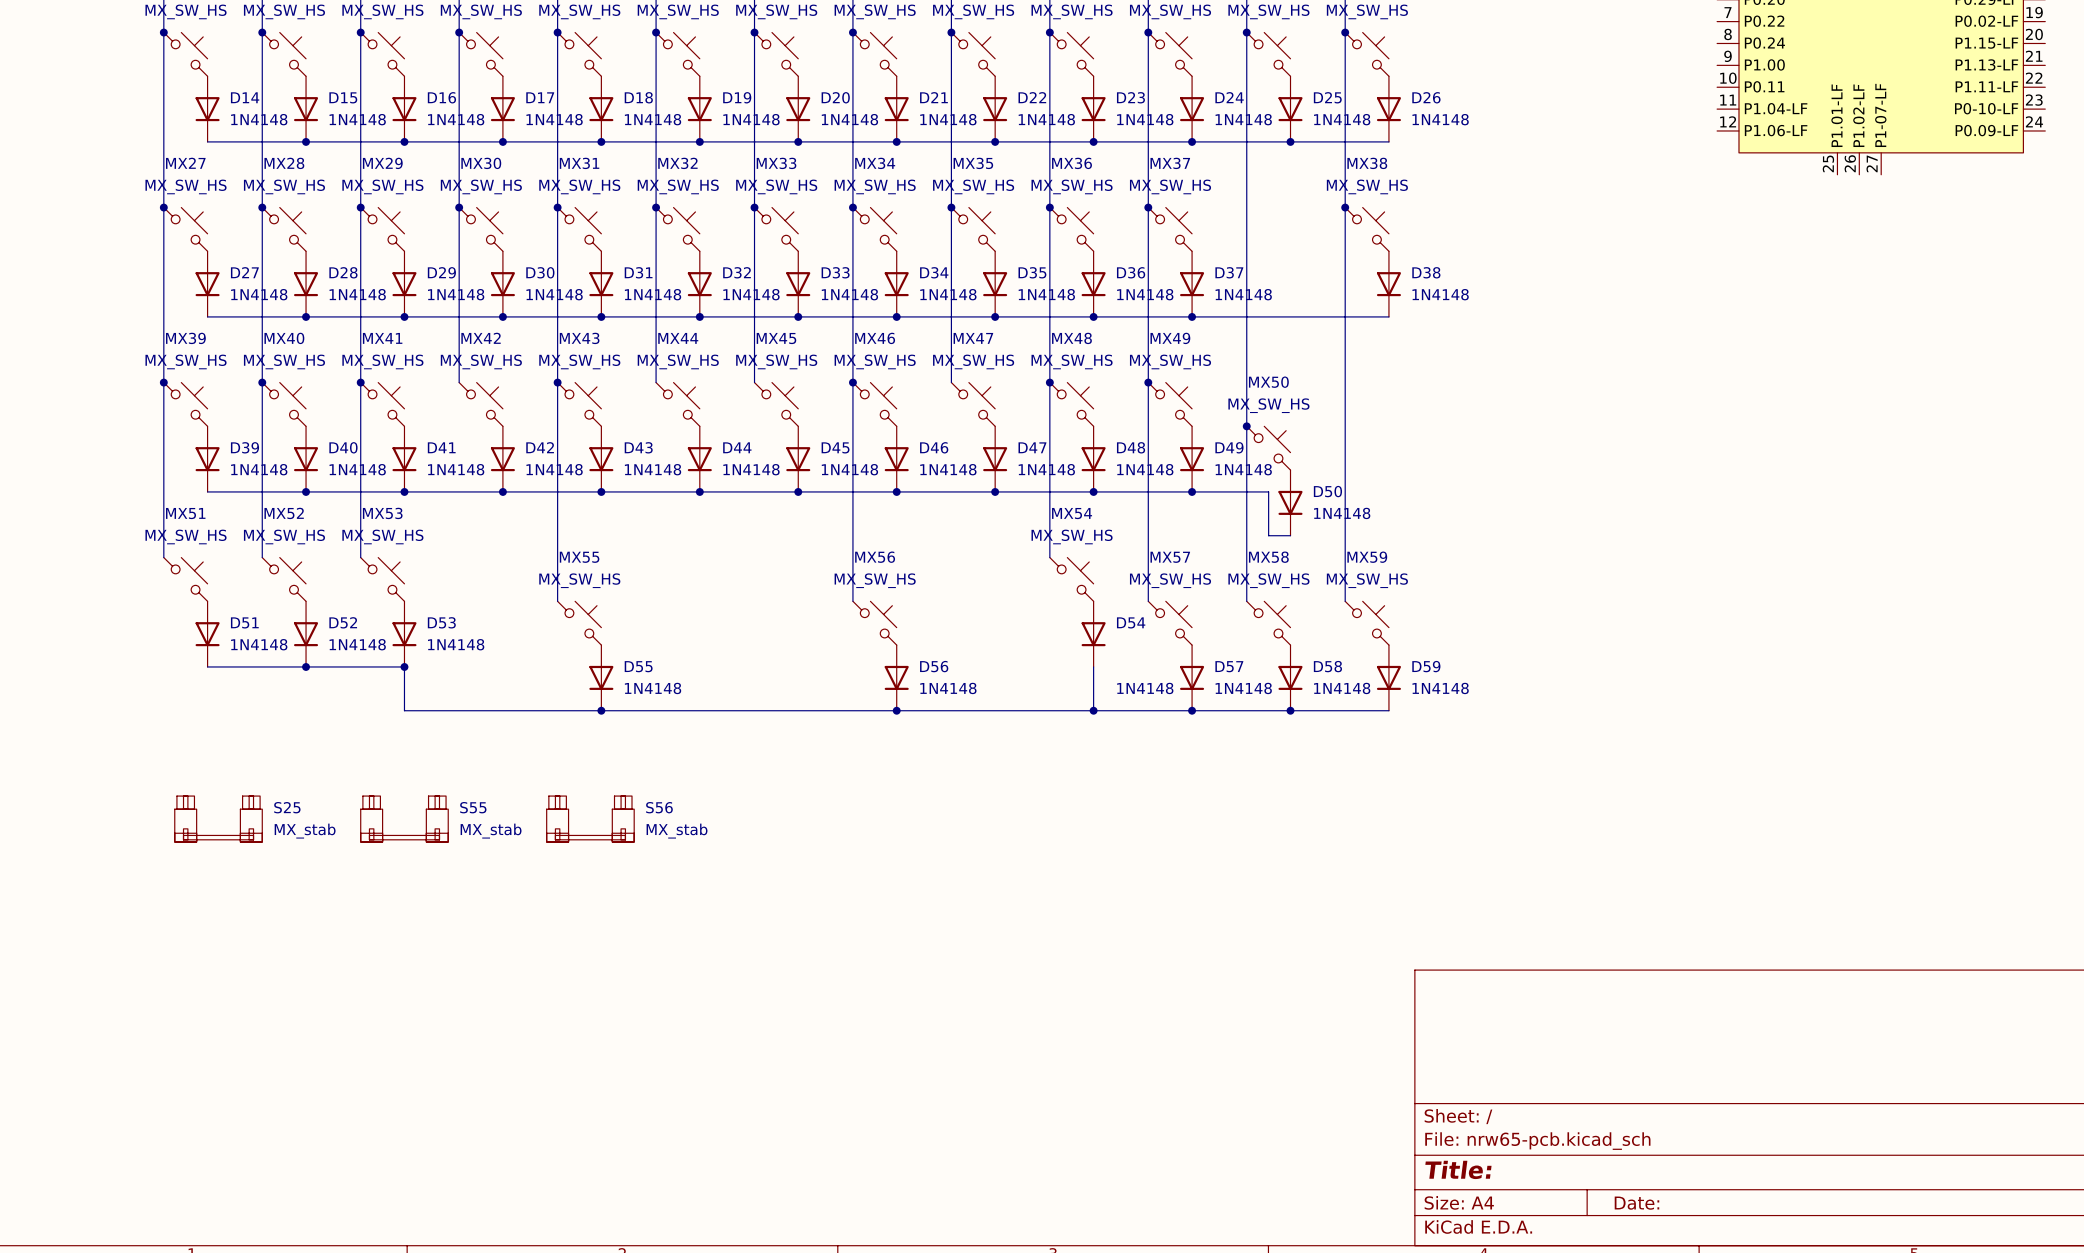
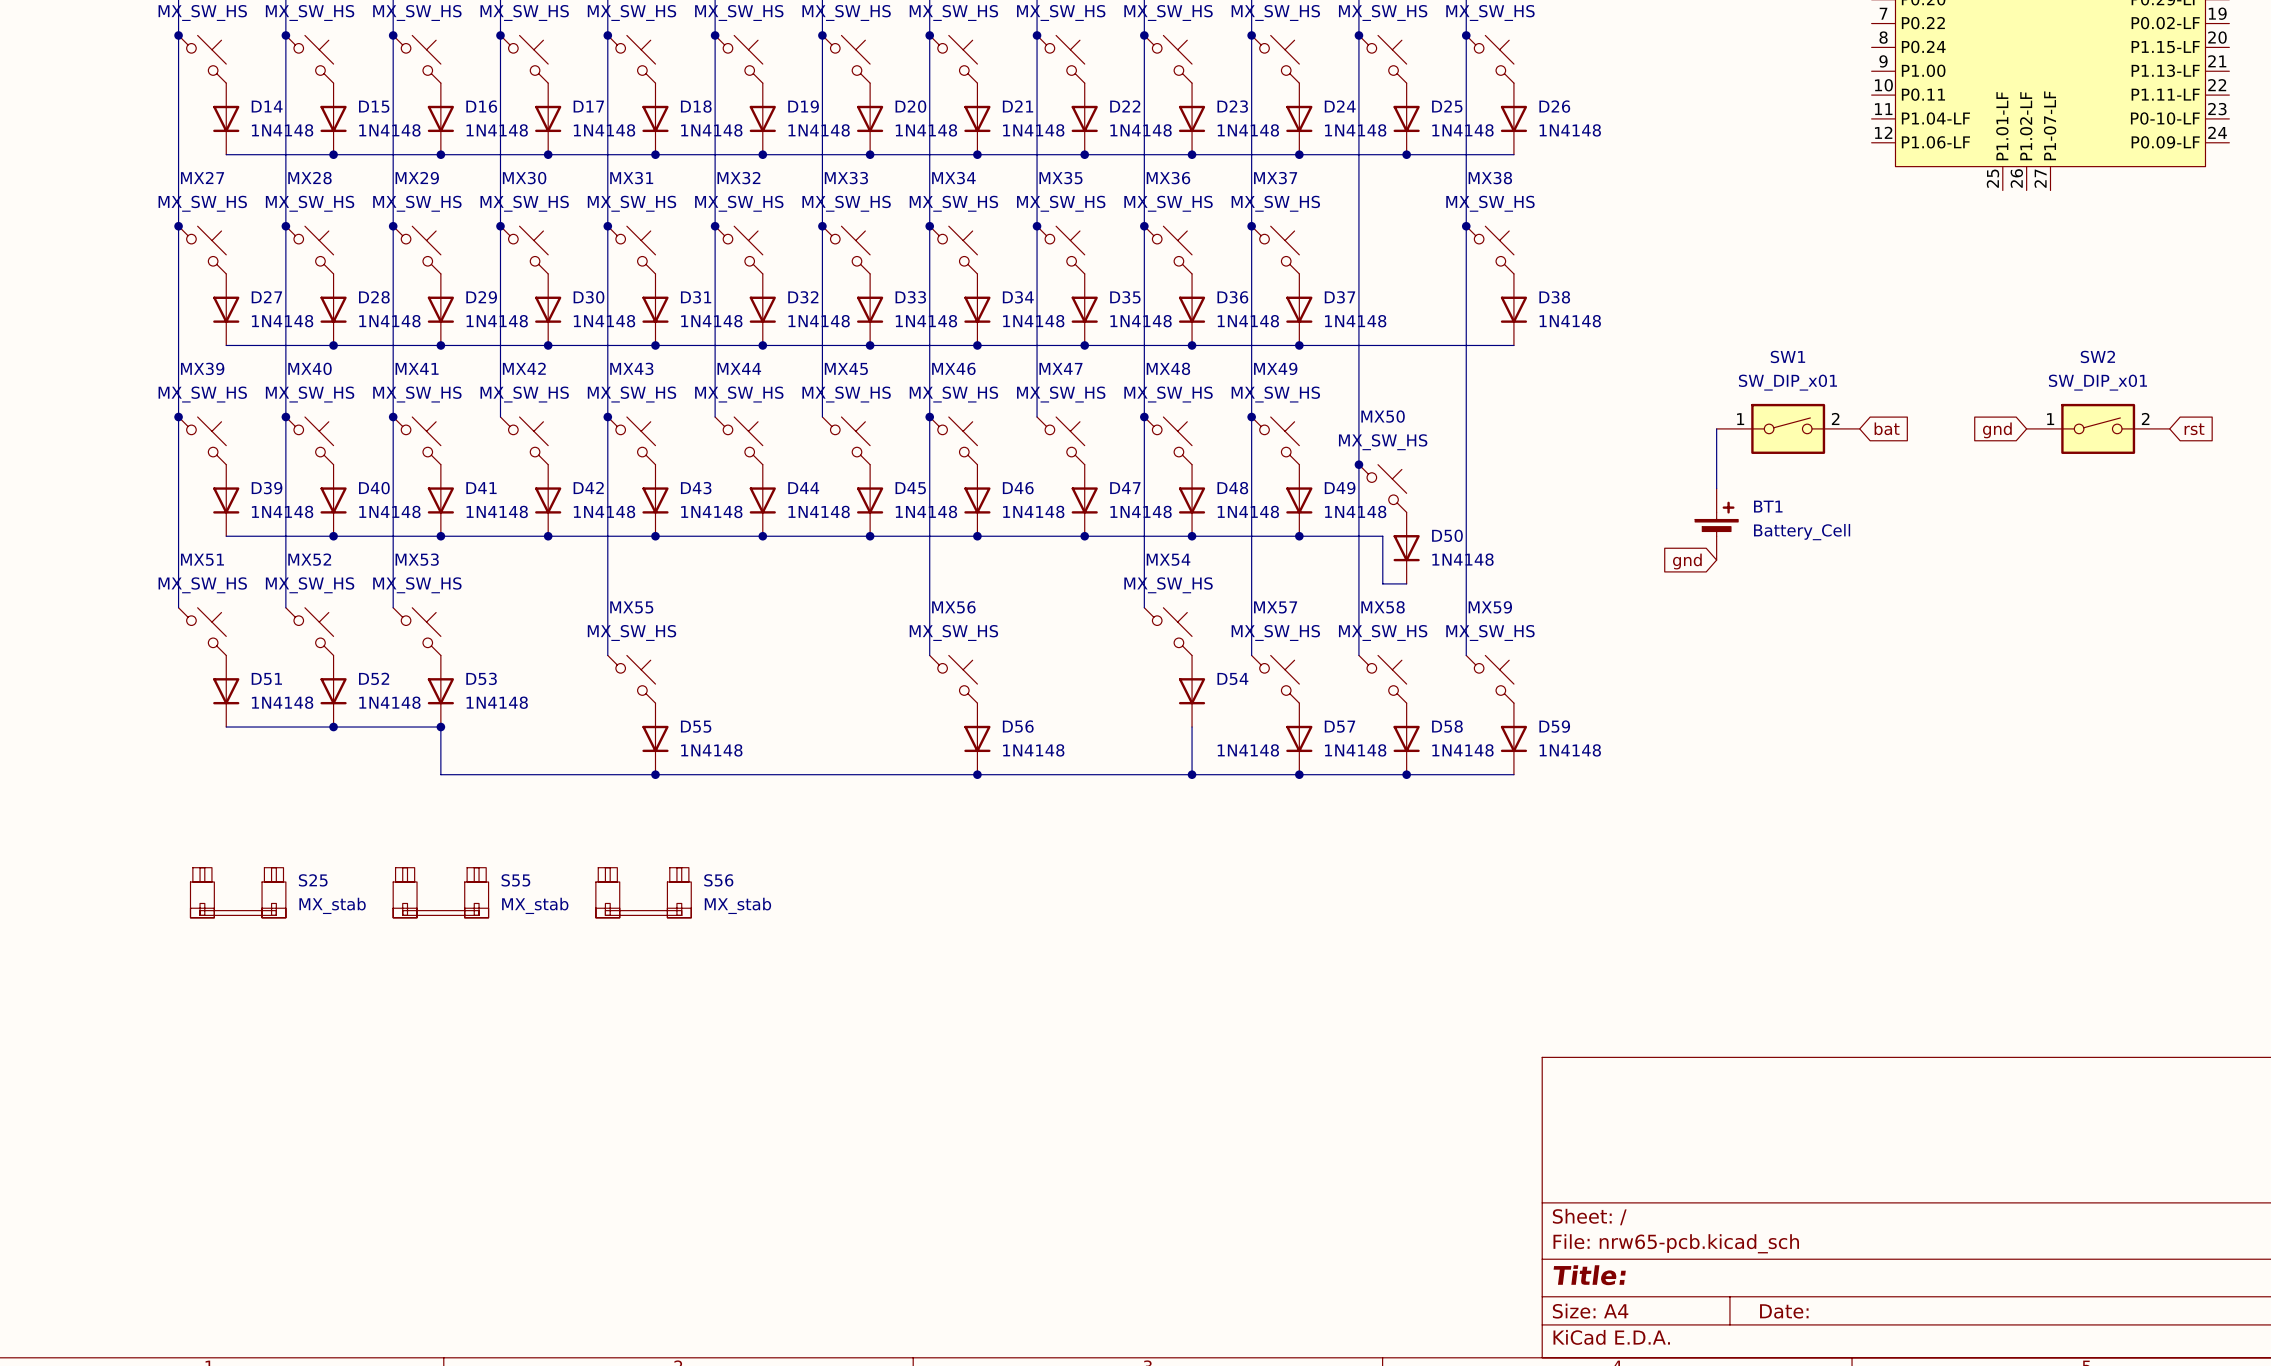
wire: none -> (1716, 428) (1716, 488)
SW1: none -> SW_DIP_x01 (1788, 428)
global label: none -> bat (1887, 428)
SW2: none -> SW_DIP_x01 (2098, 428)
global label: none -> rst (2194, 429)
global label: none -> gnd (1997, 430)
BT1: none -> Battery_Cell (1716, 524)
global label: none -> gnd (1687, 561)

